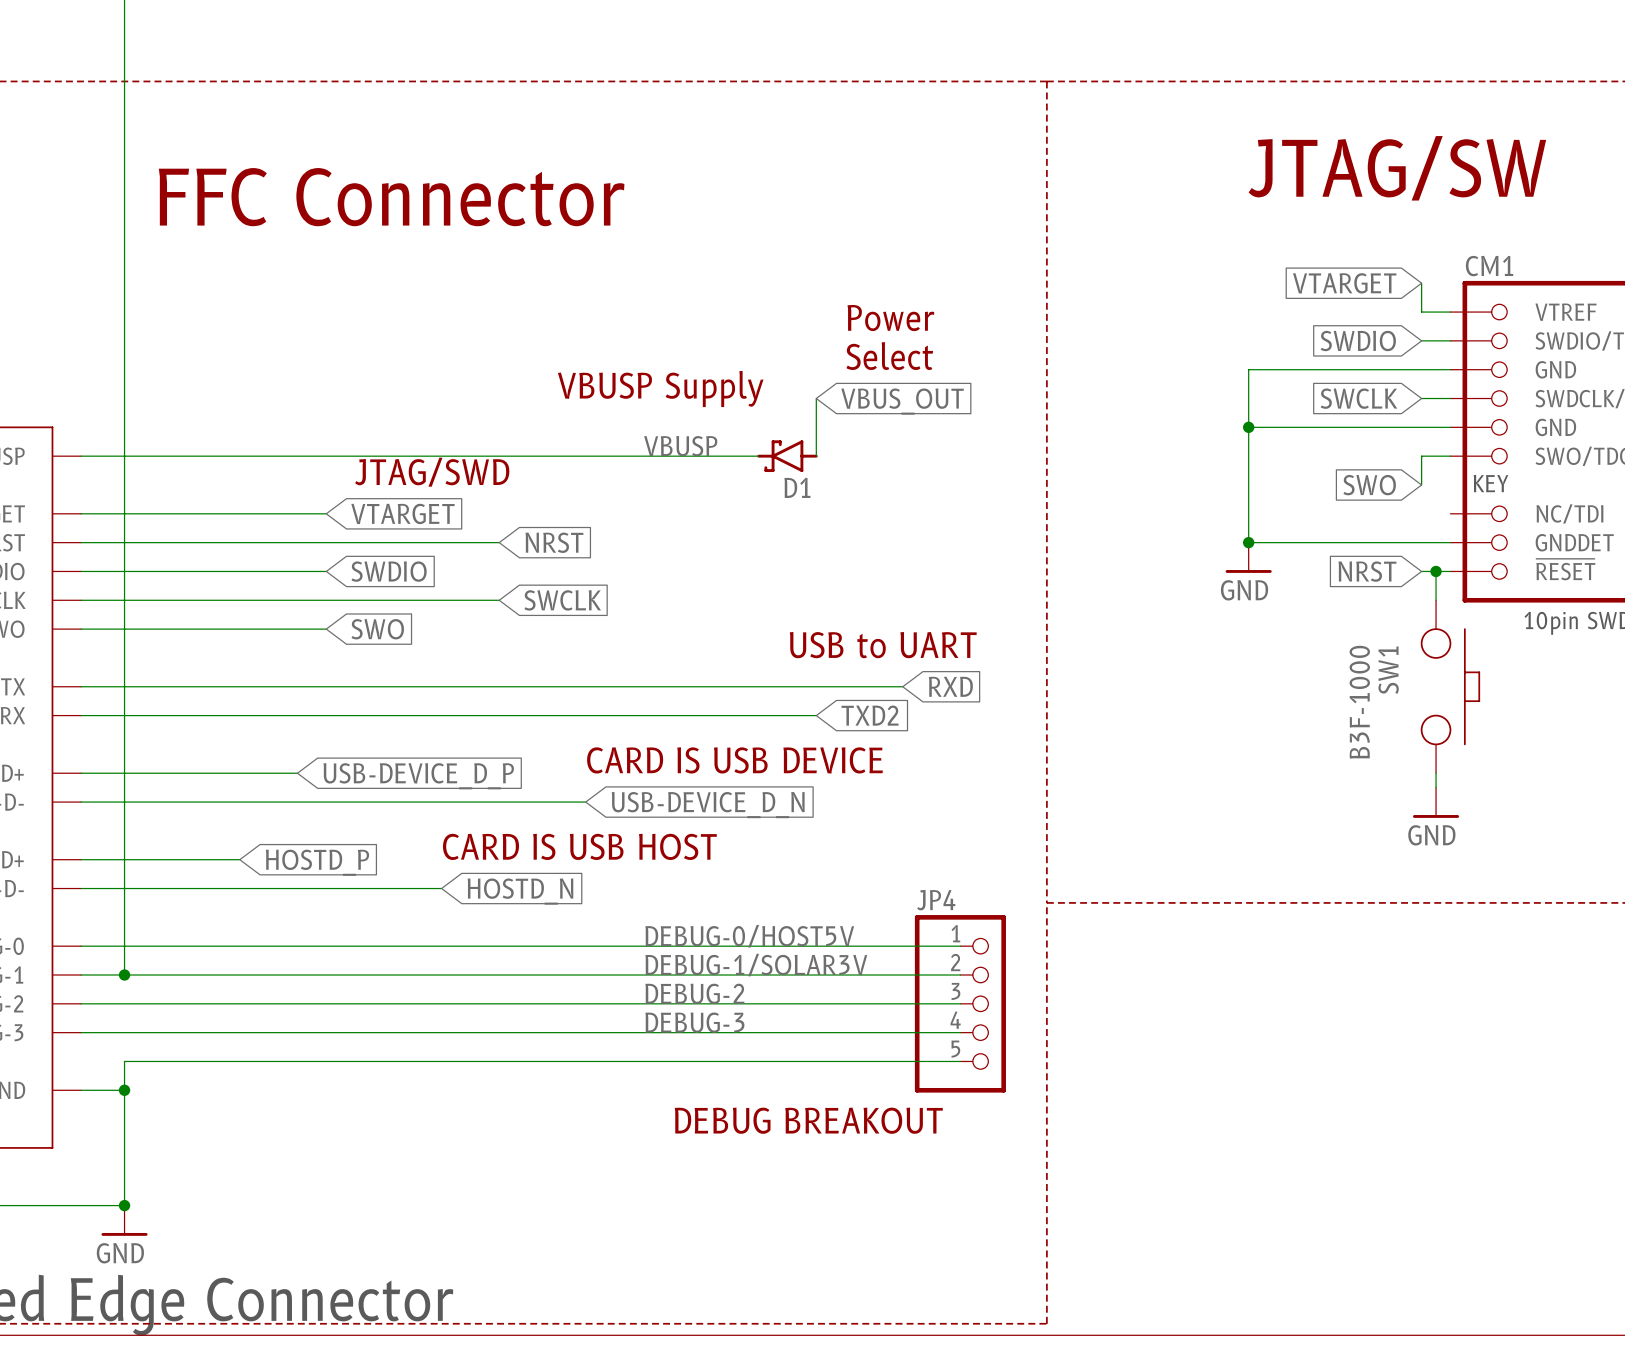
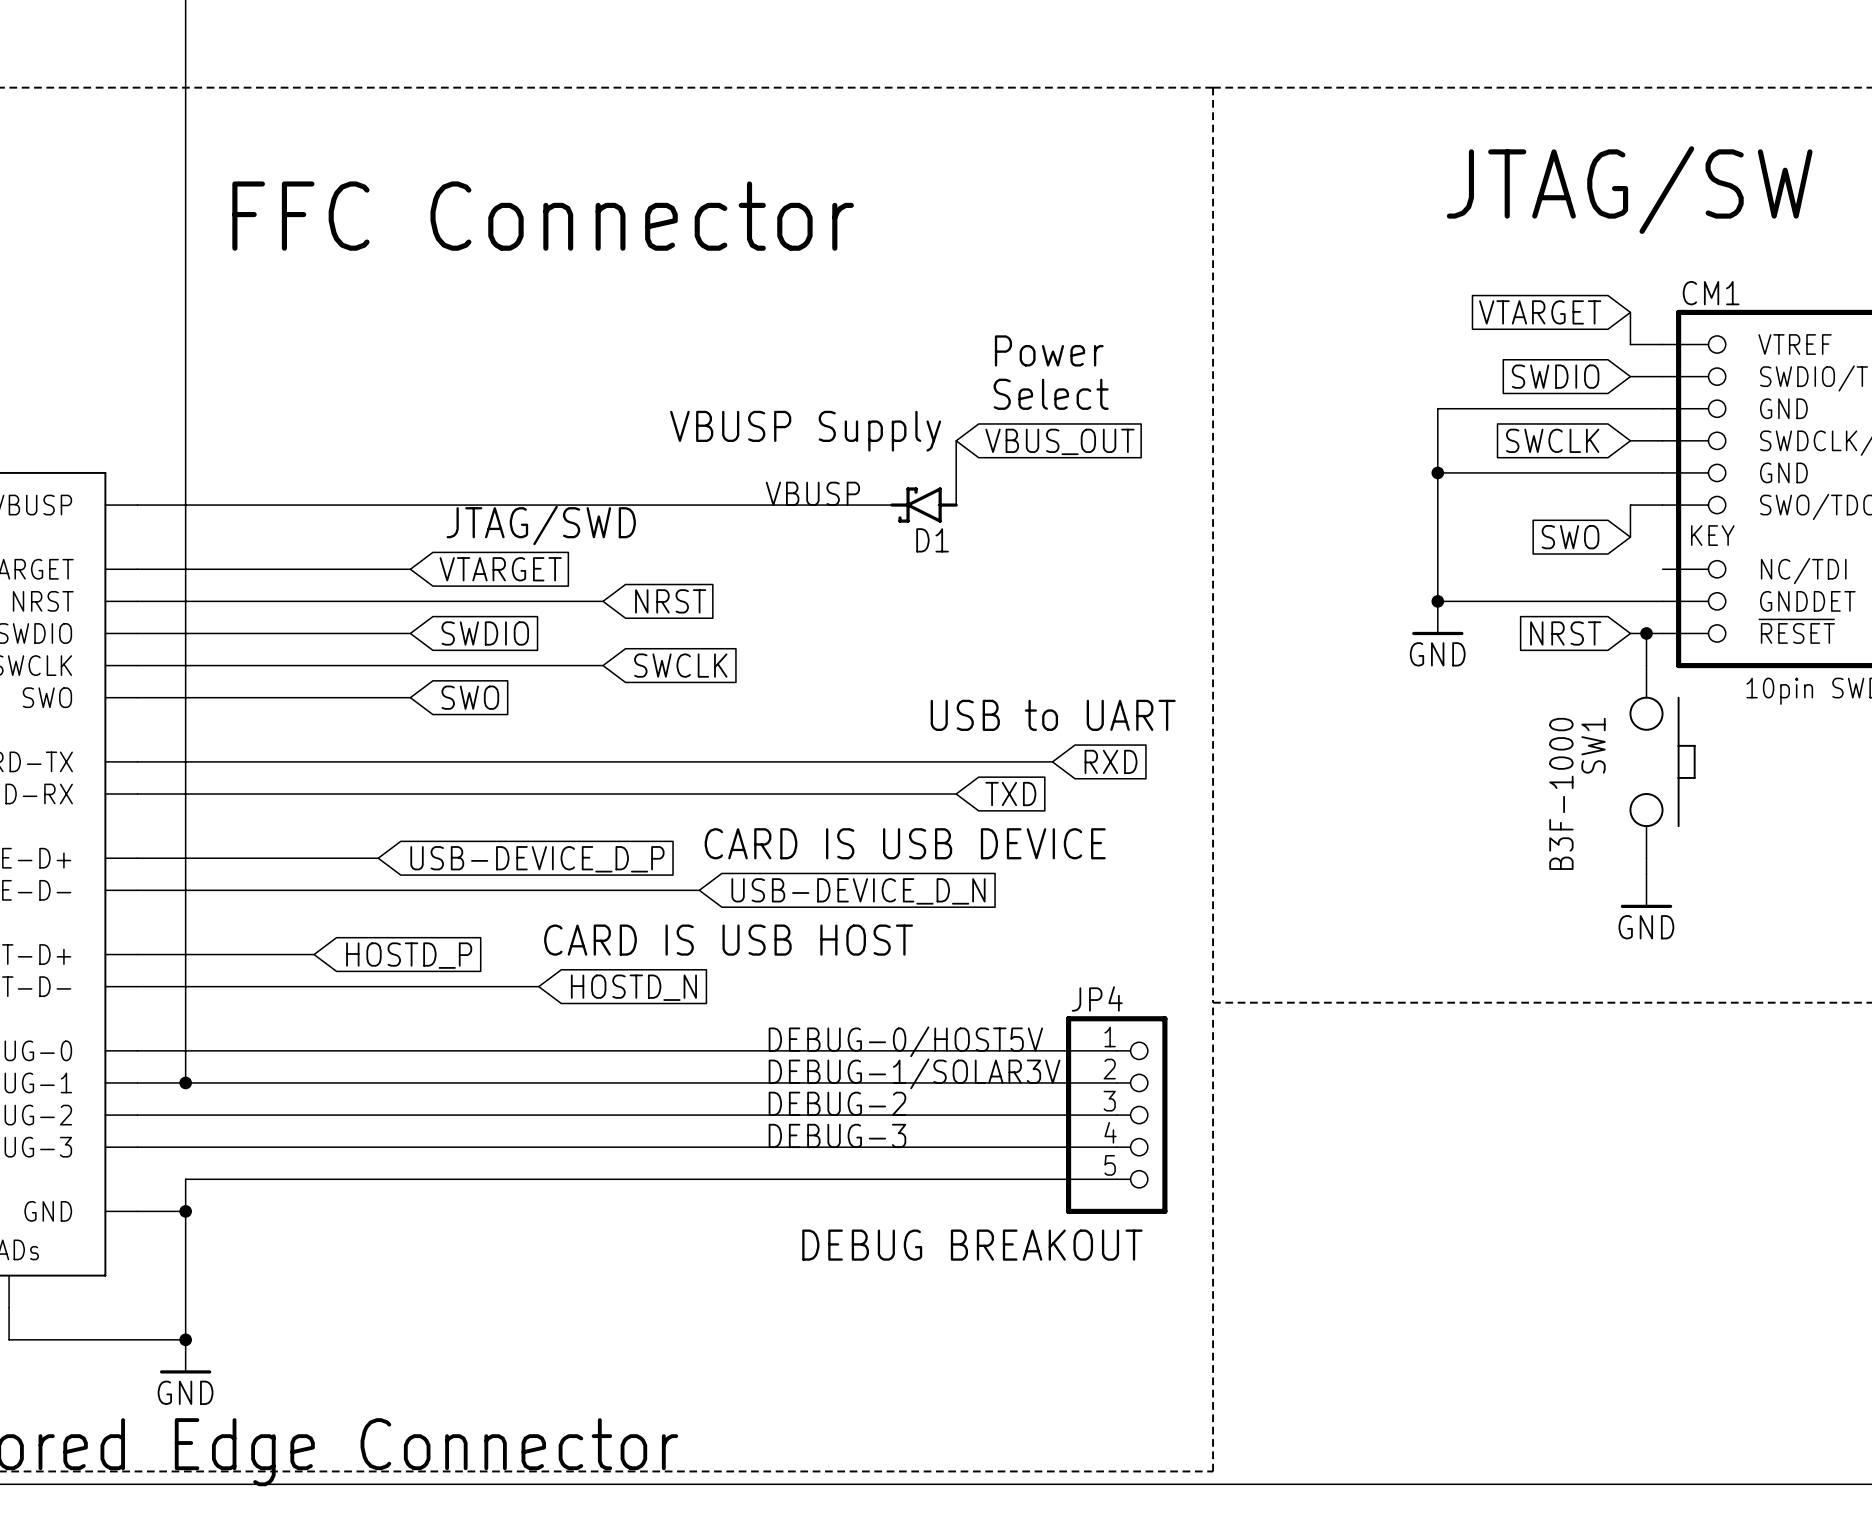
global label: TXD2 (870, 715) -> TXD (1010, 794)

